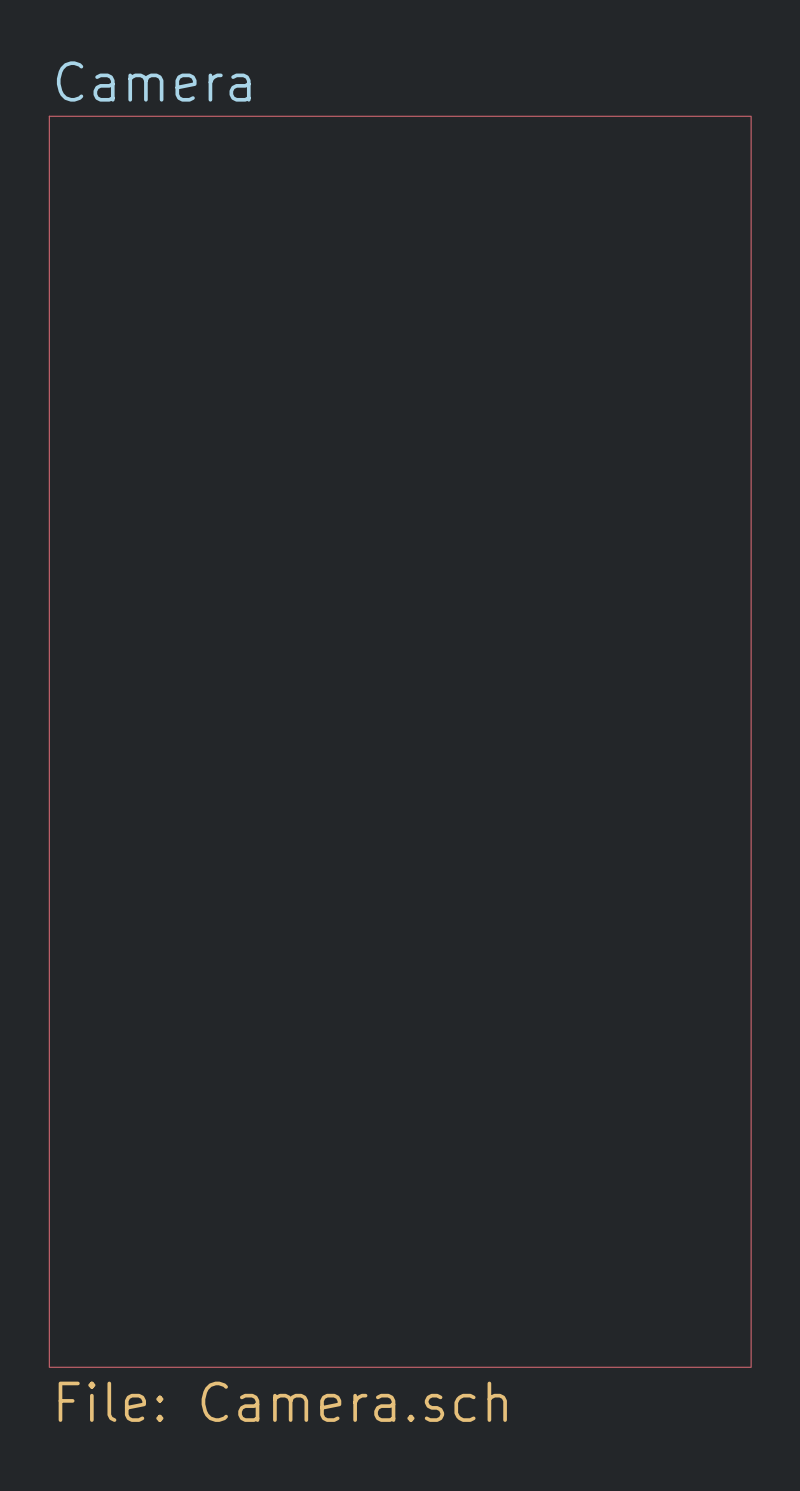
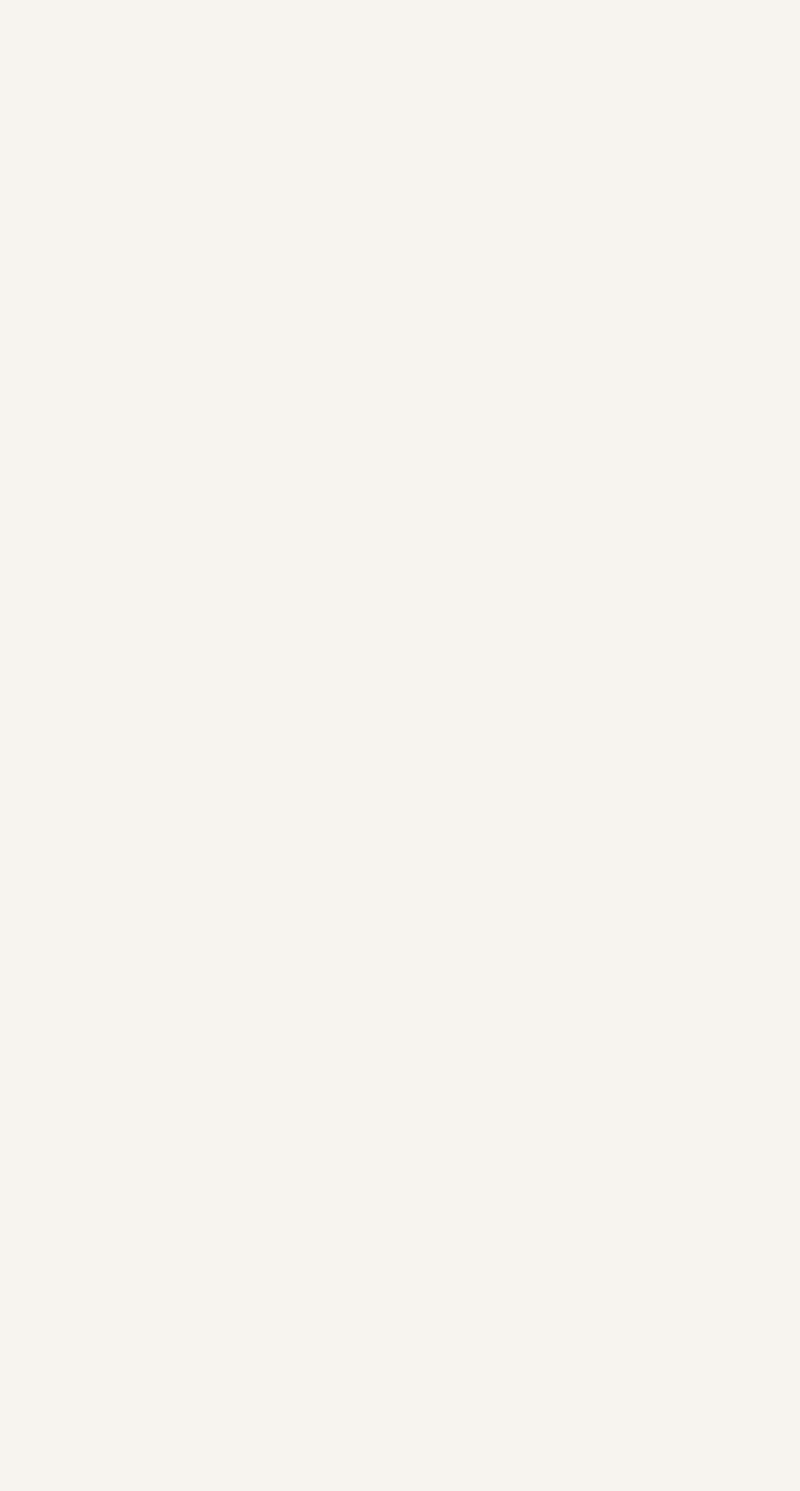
sheet Camera: File: Camera.sch (400, 741) -> none

